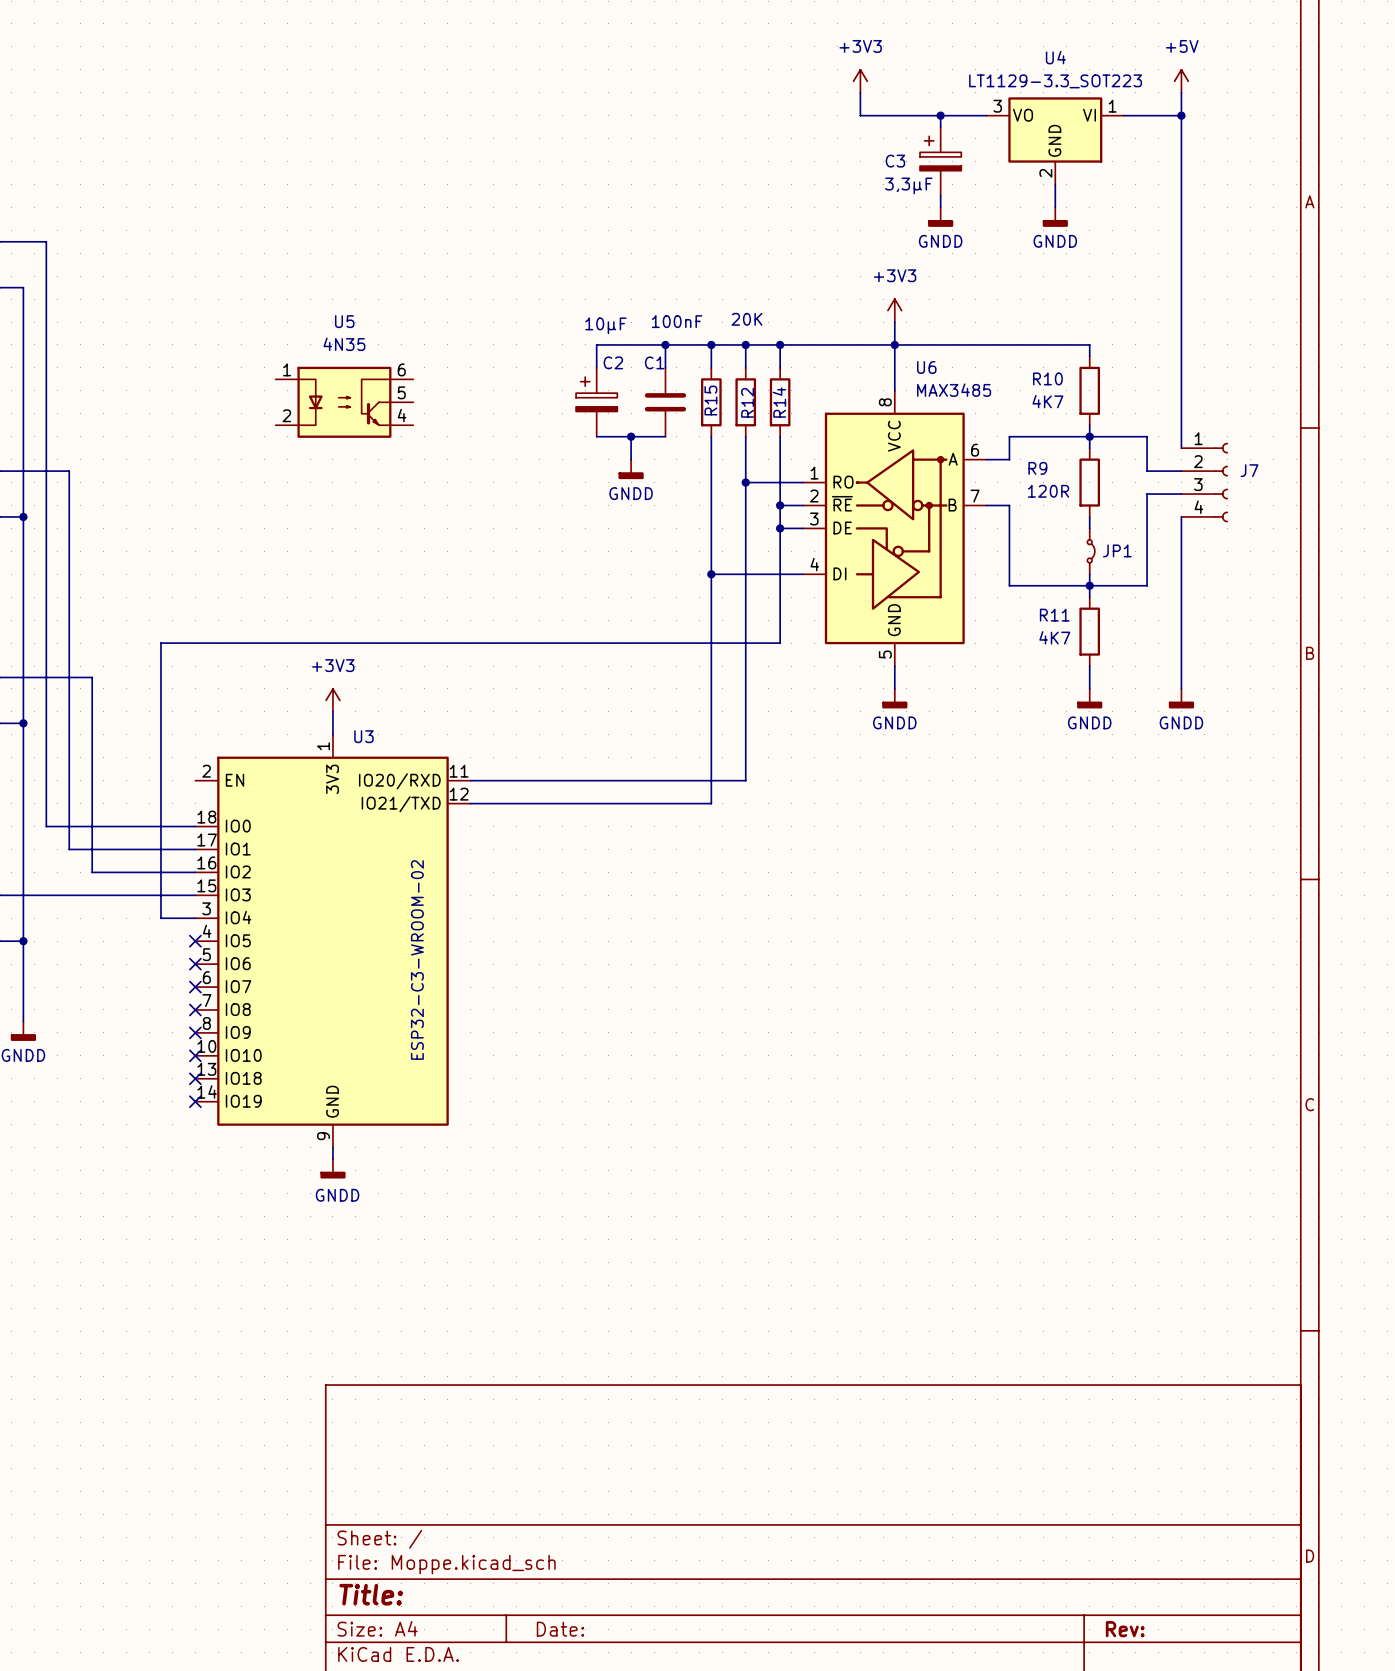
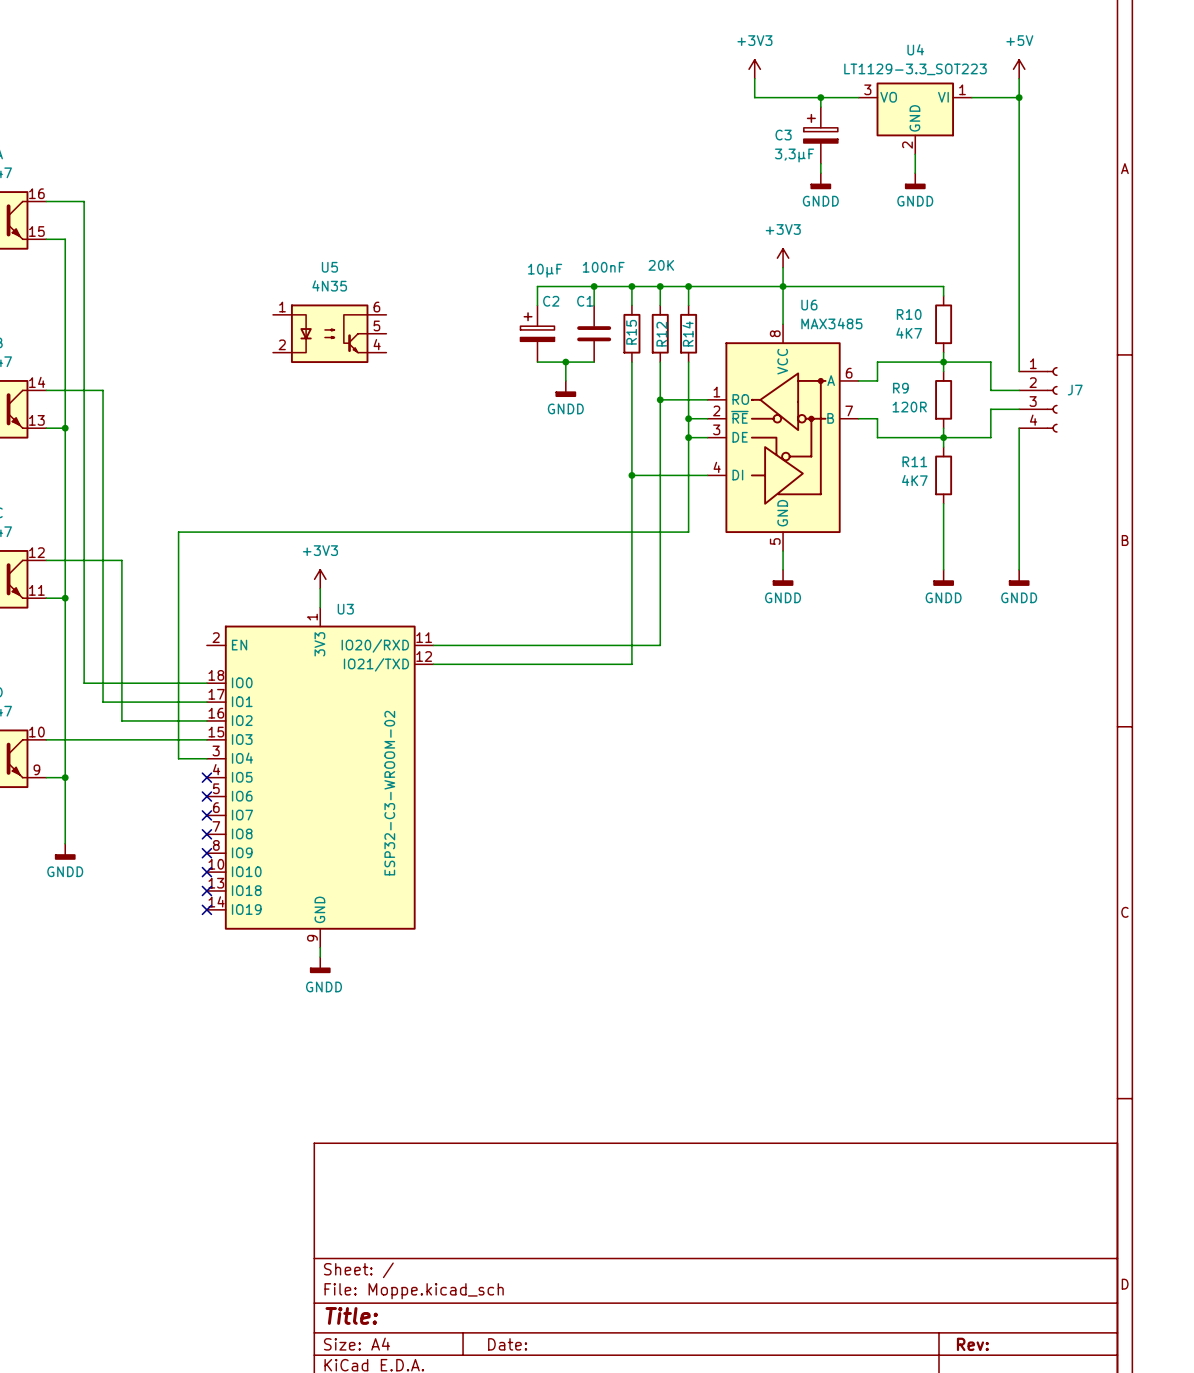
wire: (1009, 528) (1009, 585) (1147, 585) (1147, 528) -> (877, 437) (990, 437)
junction: none -> (943, 437)
JP1: (1091, 551) -> none
wire: (1089, 574) (1089, 597) -> none
junction: (1089, 585) -> none
wire: none -> (943, 503) (943, 550)
R11 position: (1089, 631) -> (943, 475)

